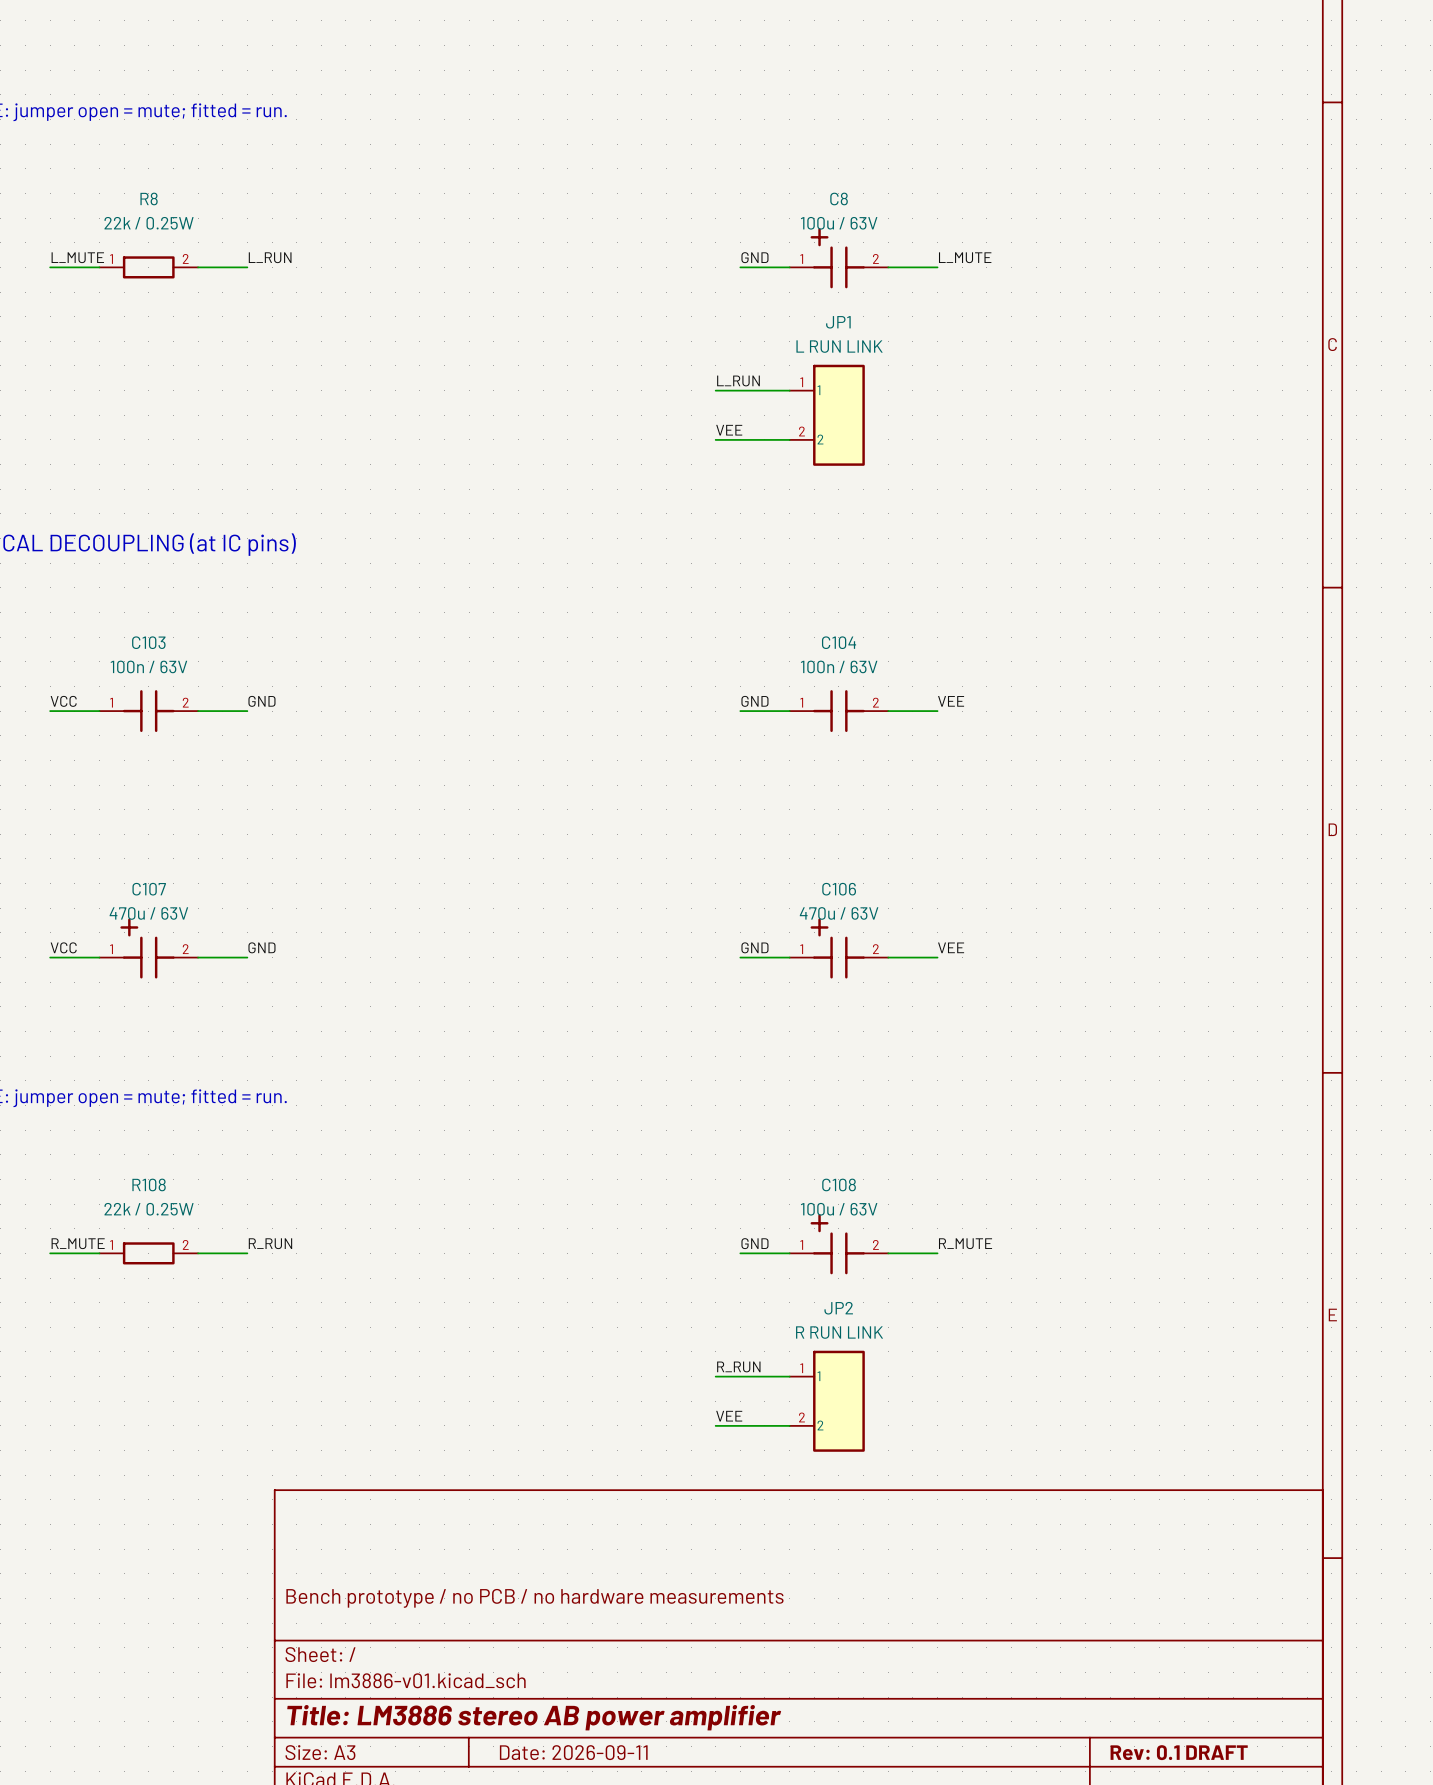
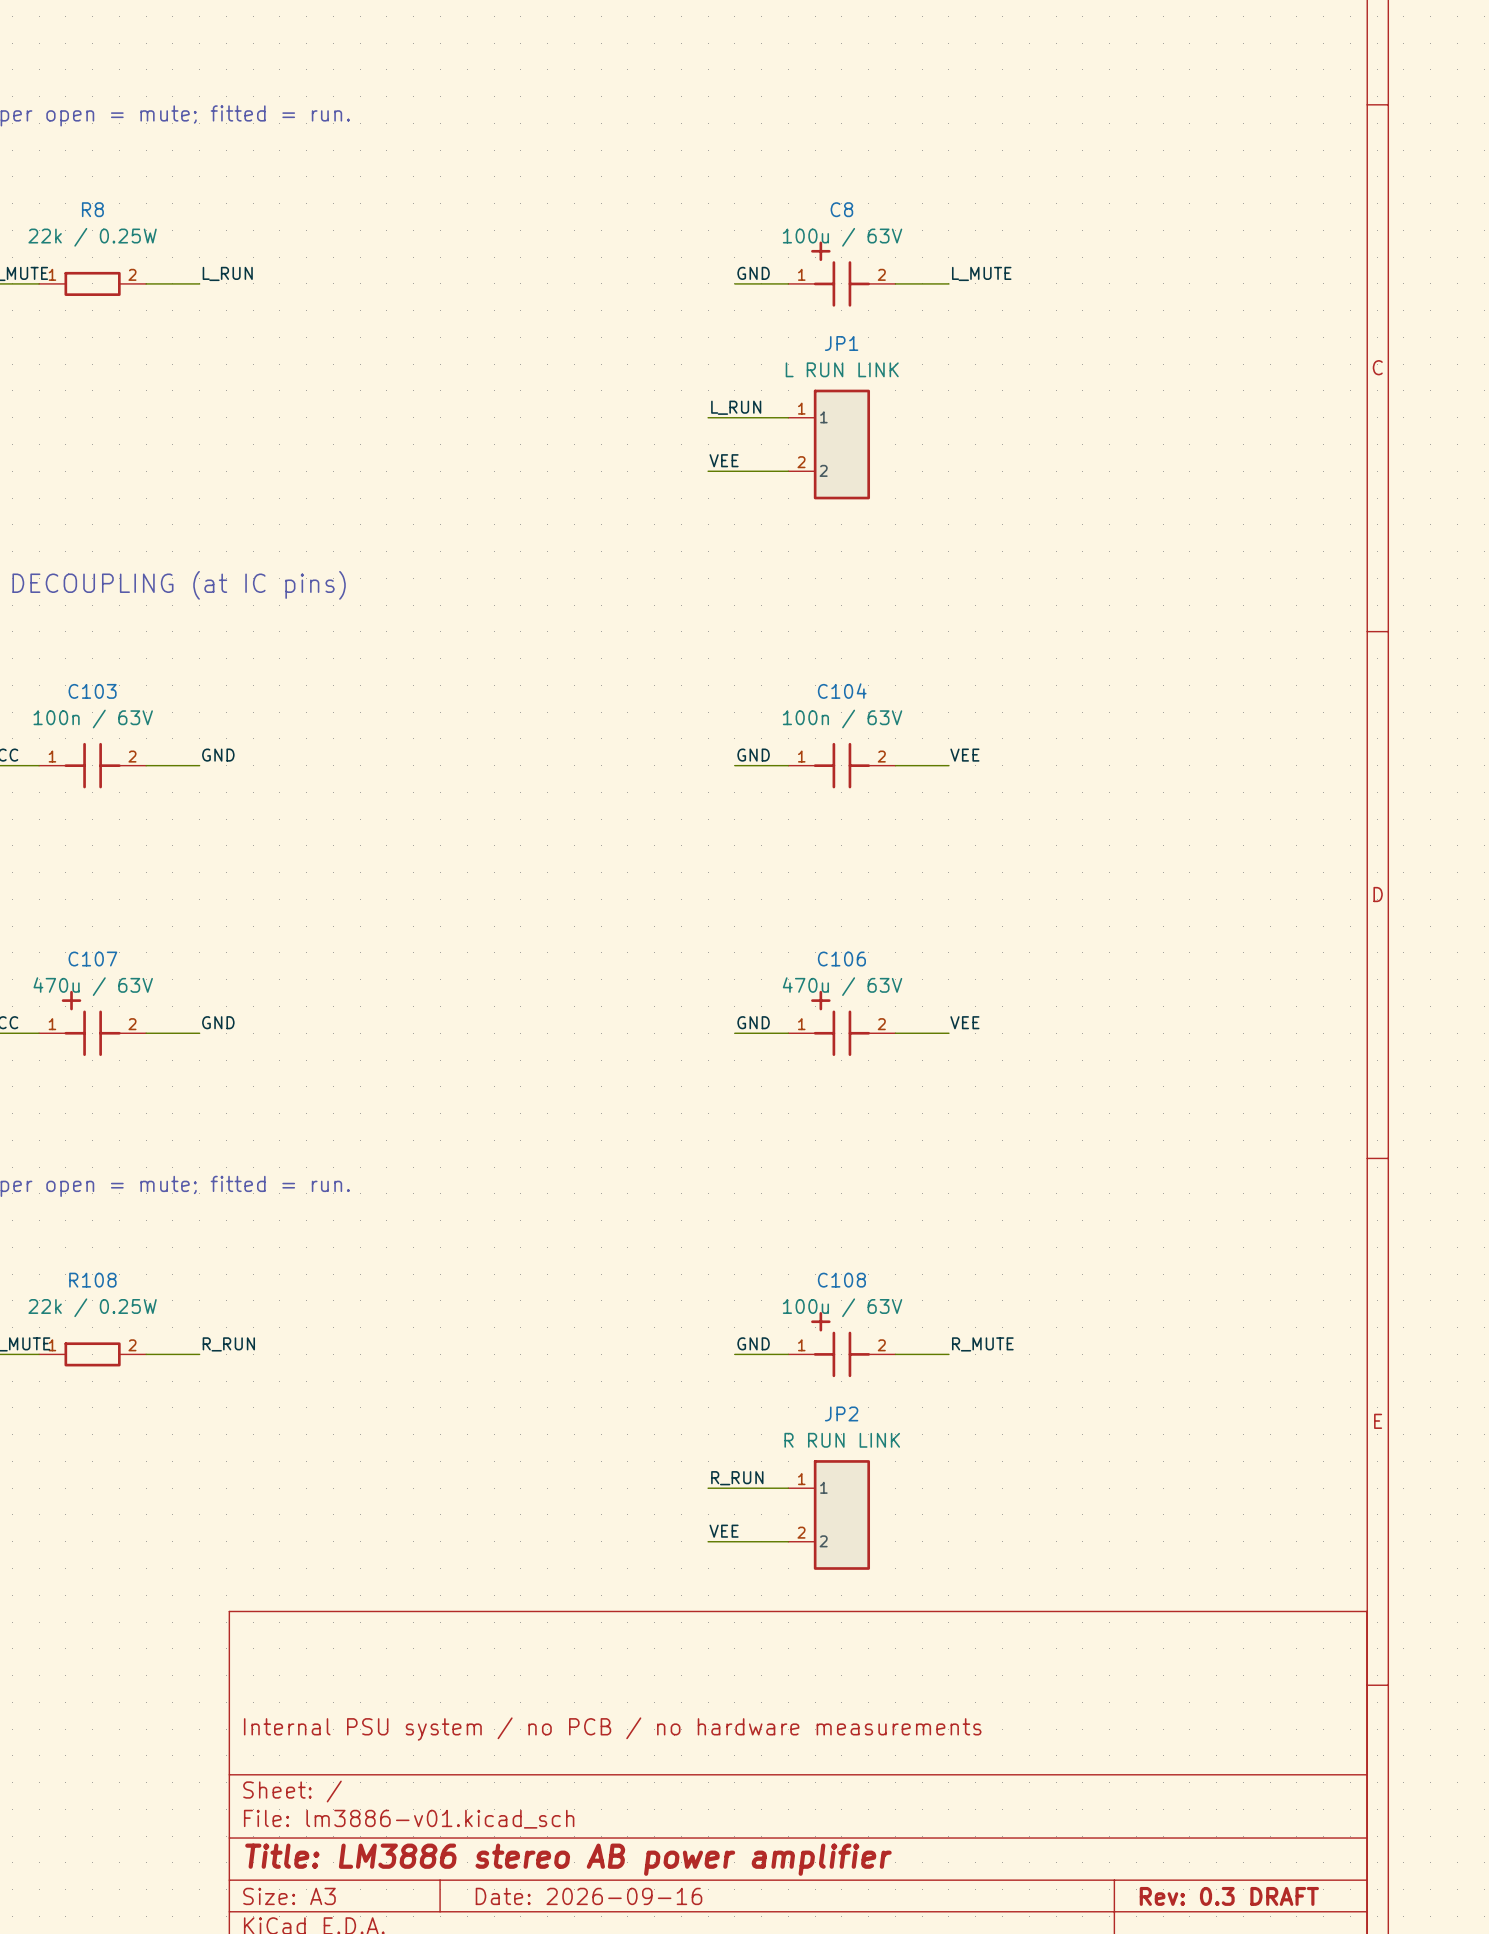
title block: Bench prototype / no PCB / no hardware measurements (534, 1598) -> Internal PSU system / no PCB / no hardware measurements (612, 1729)
title block: Date: 2026-09-11 (573, 1752) -> Date: 2026-09-16 (589, 1896)
title block: Rev: 0.1 DRAFT (1179, 1752) -> Rev: 0.3 DRAFT (1229, 1896)

